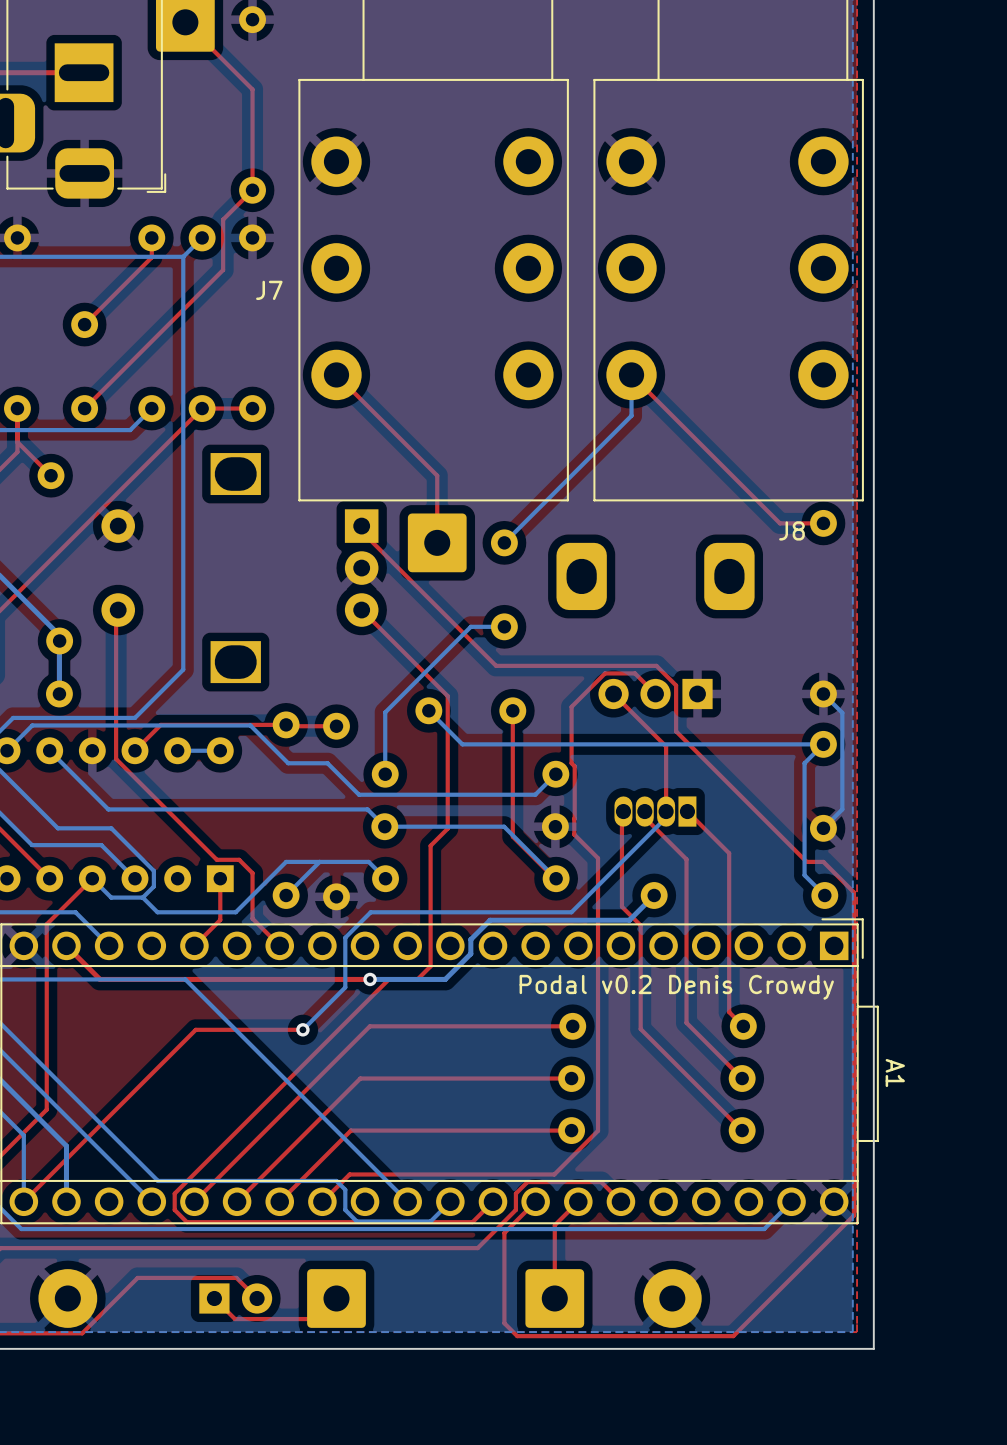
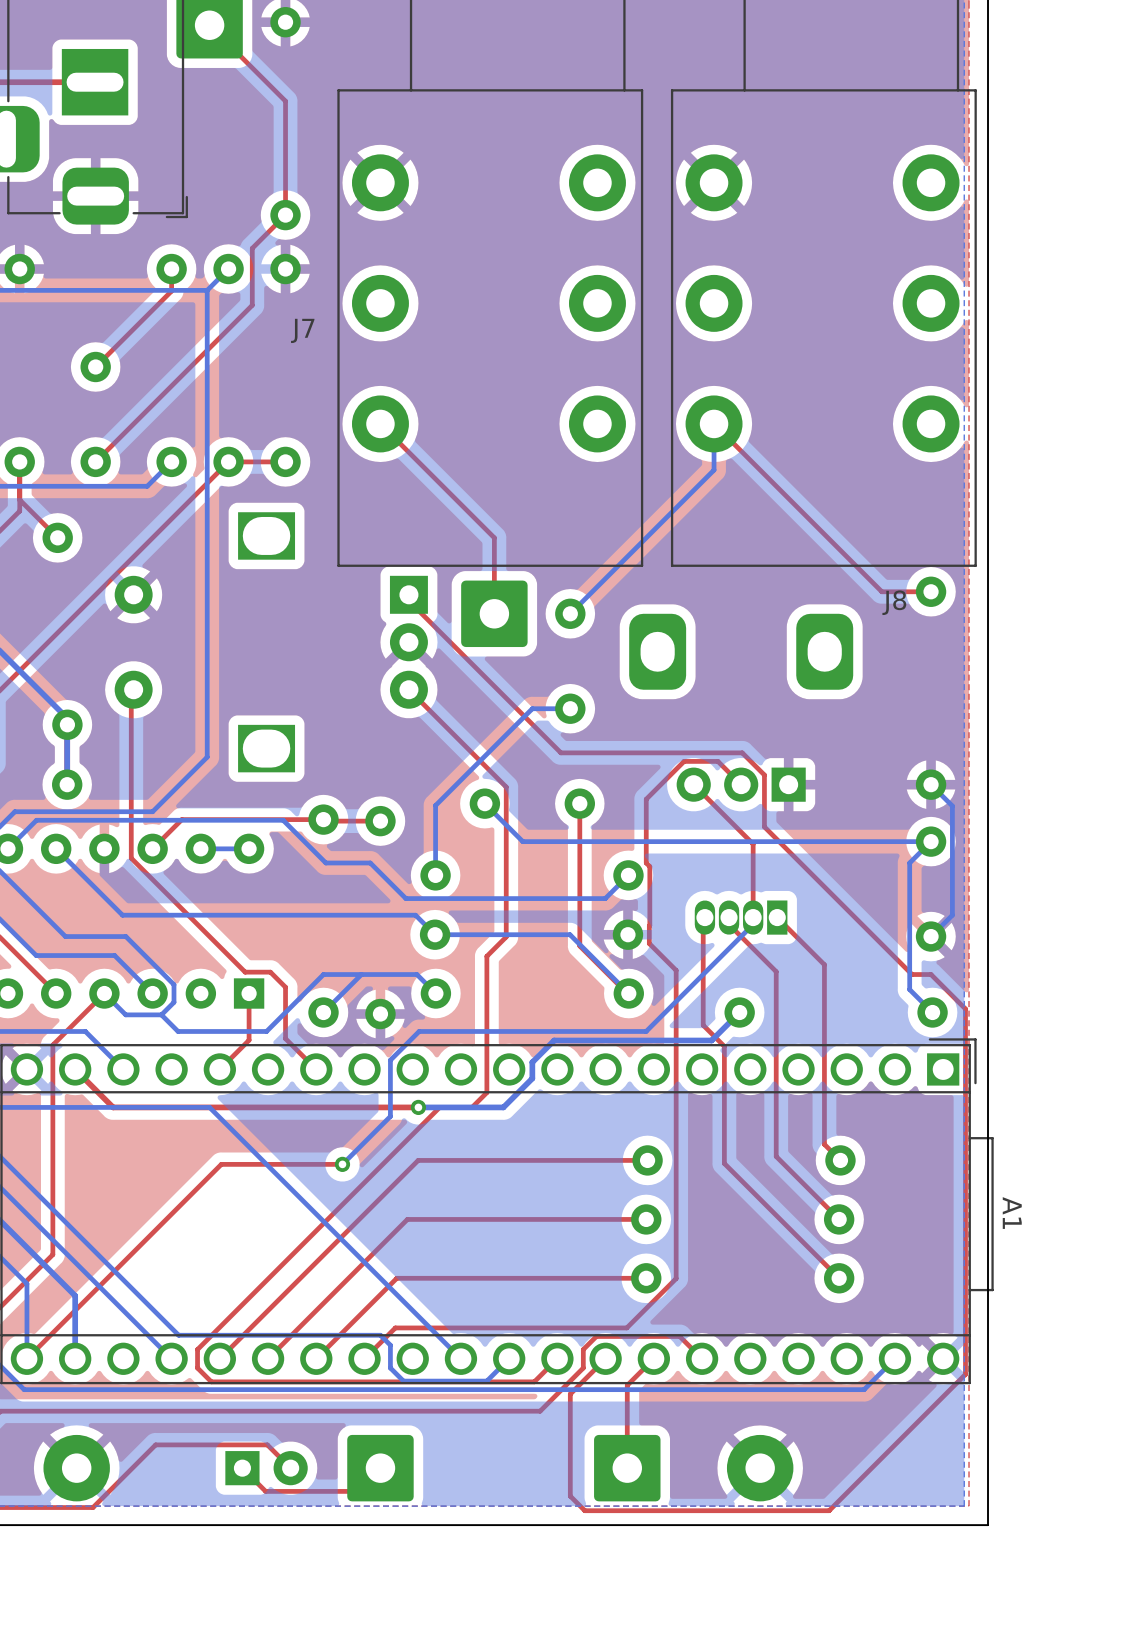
text: Podal v0.2 Denis Crowdy (676, 987) -> none

